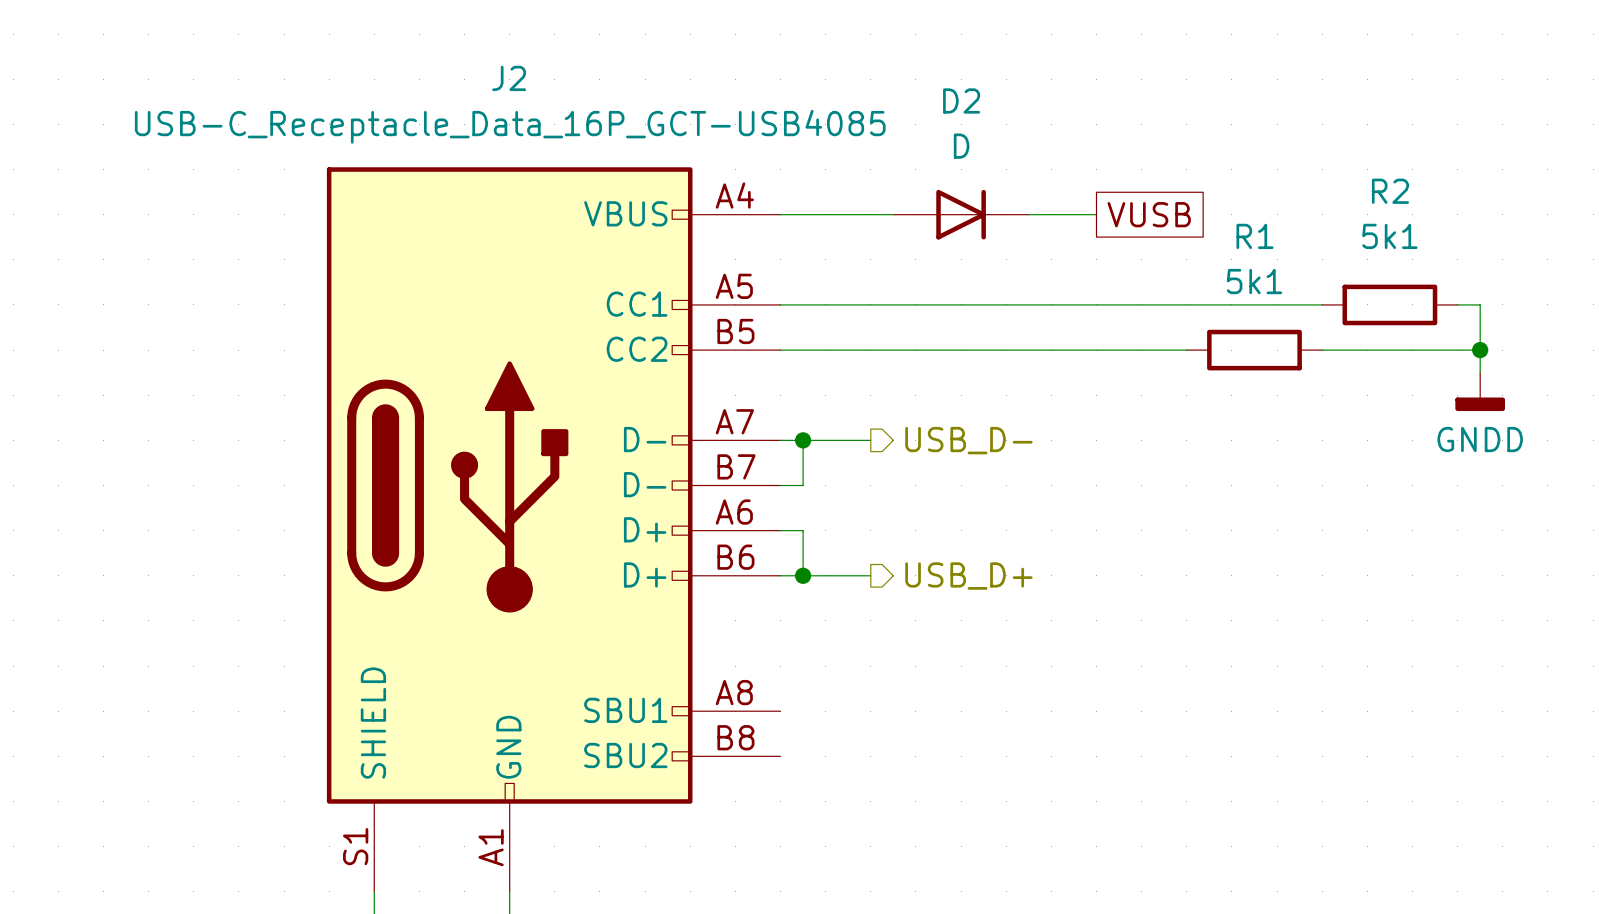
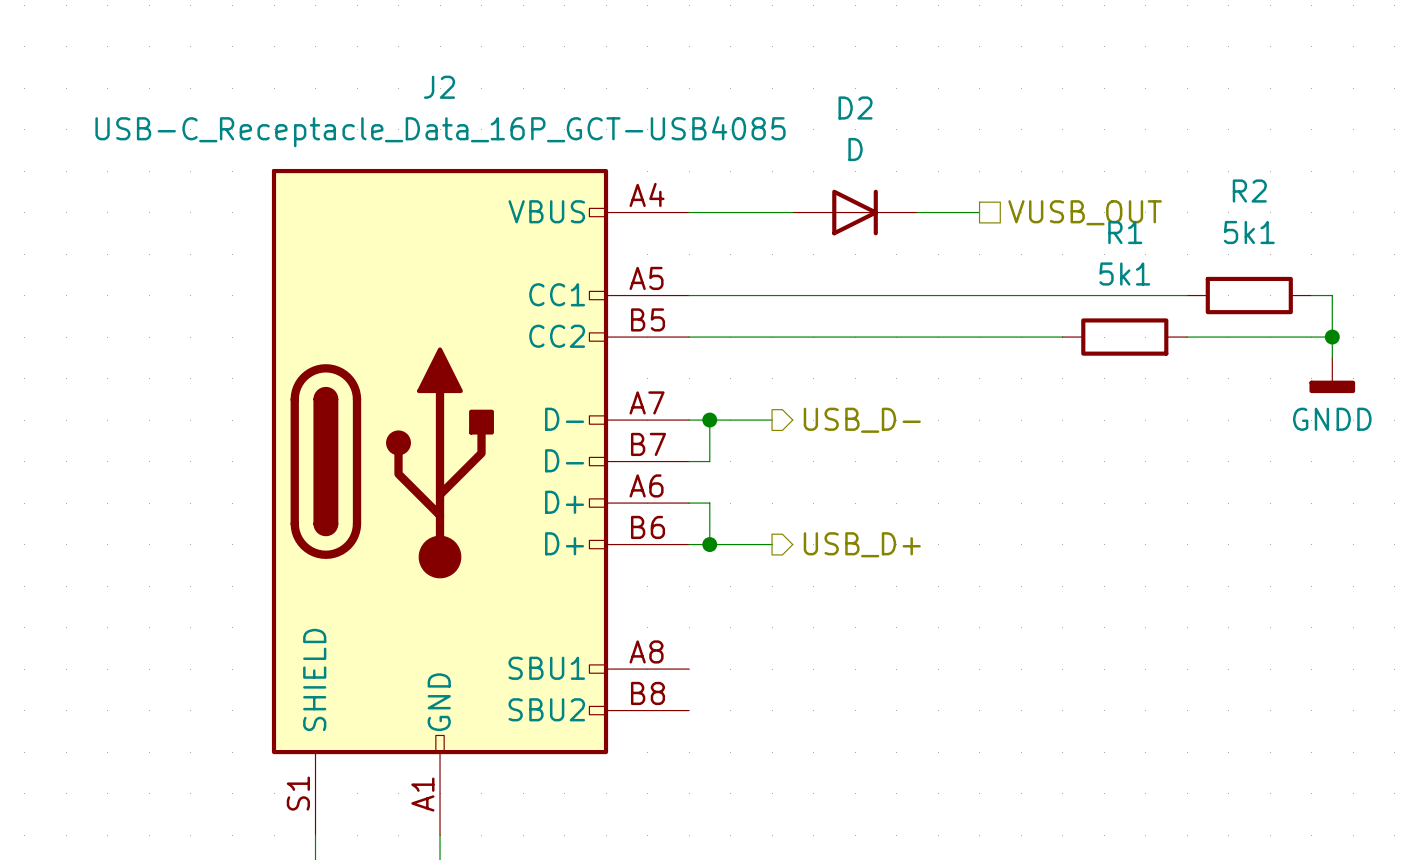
global label: VUSB (1149, 214) -> none
hierarchical label: none -> VUSB_OUT (1085, 212)

